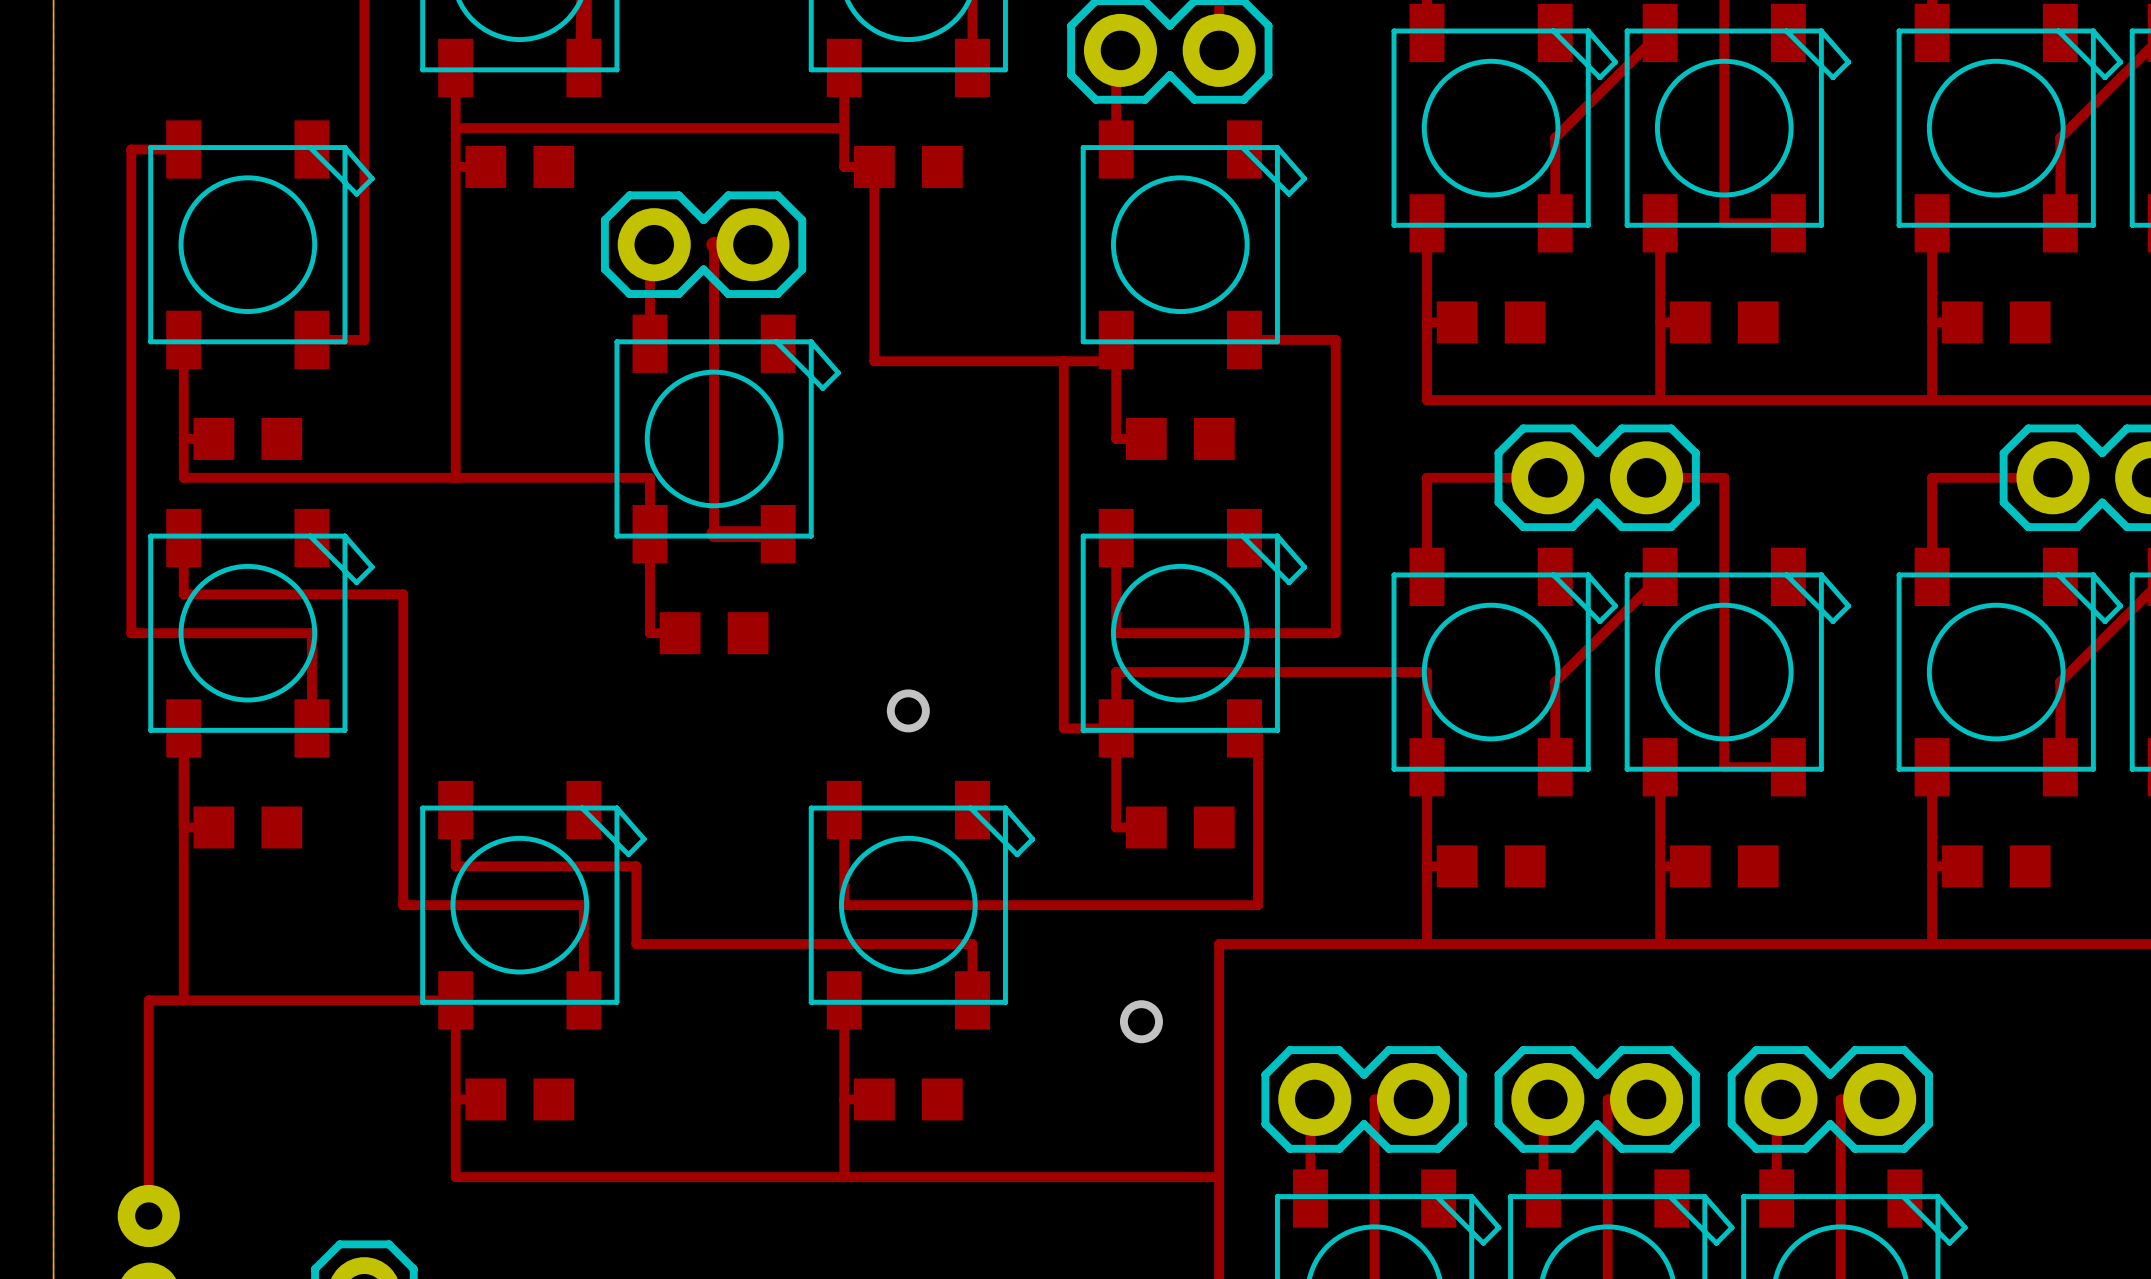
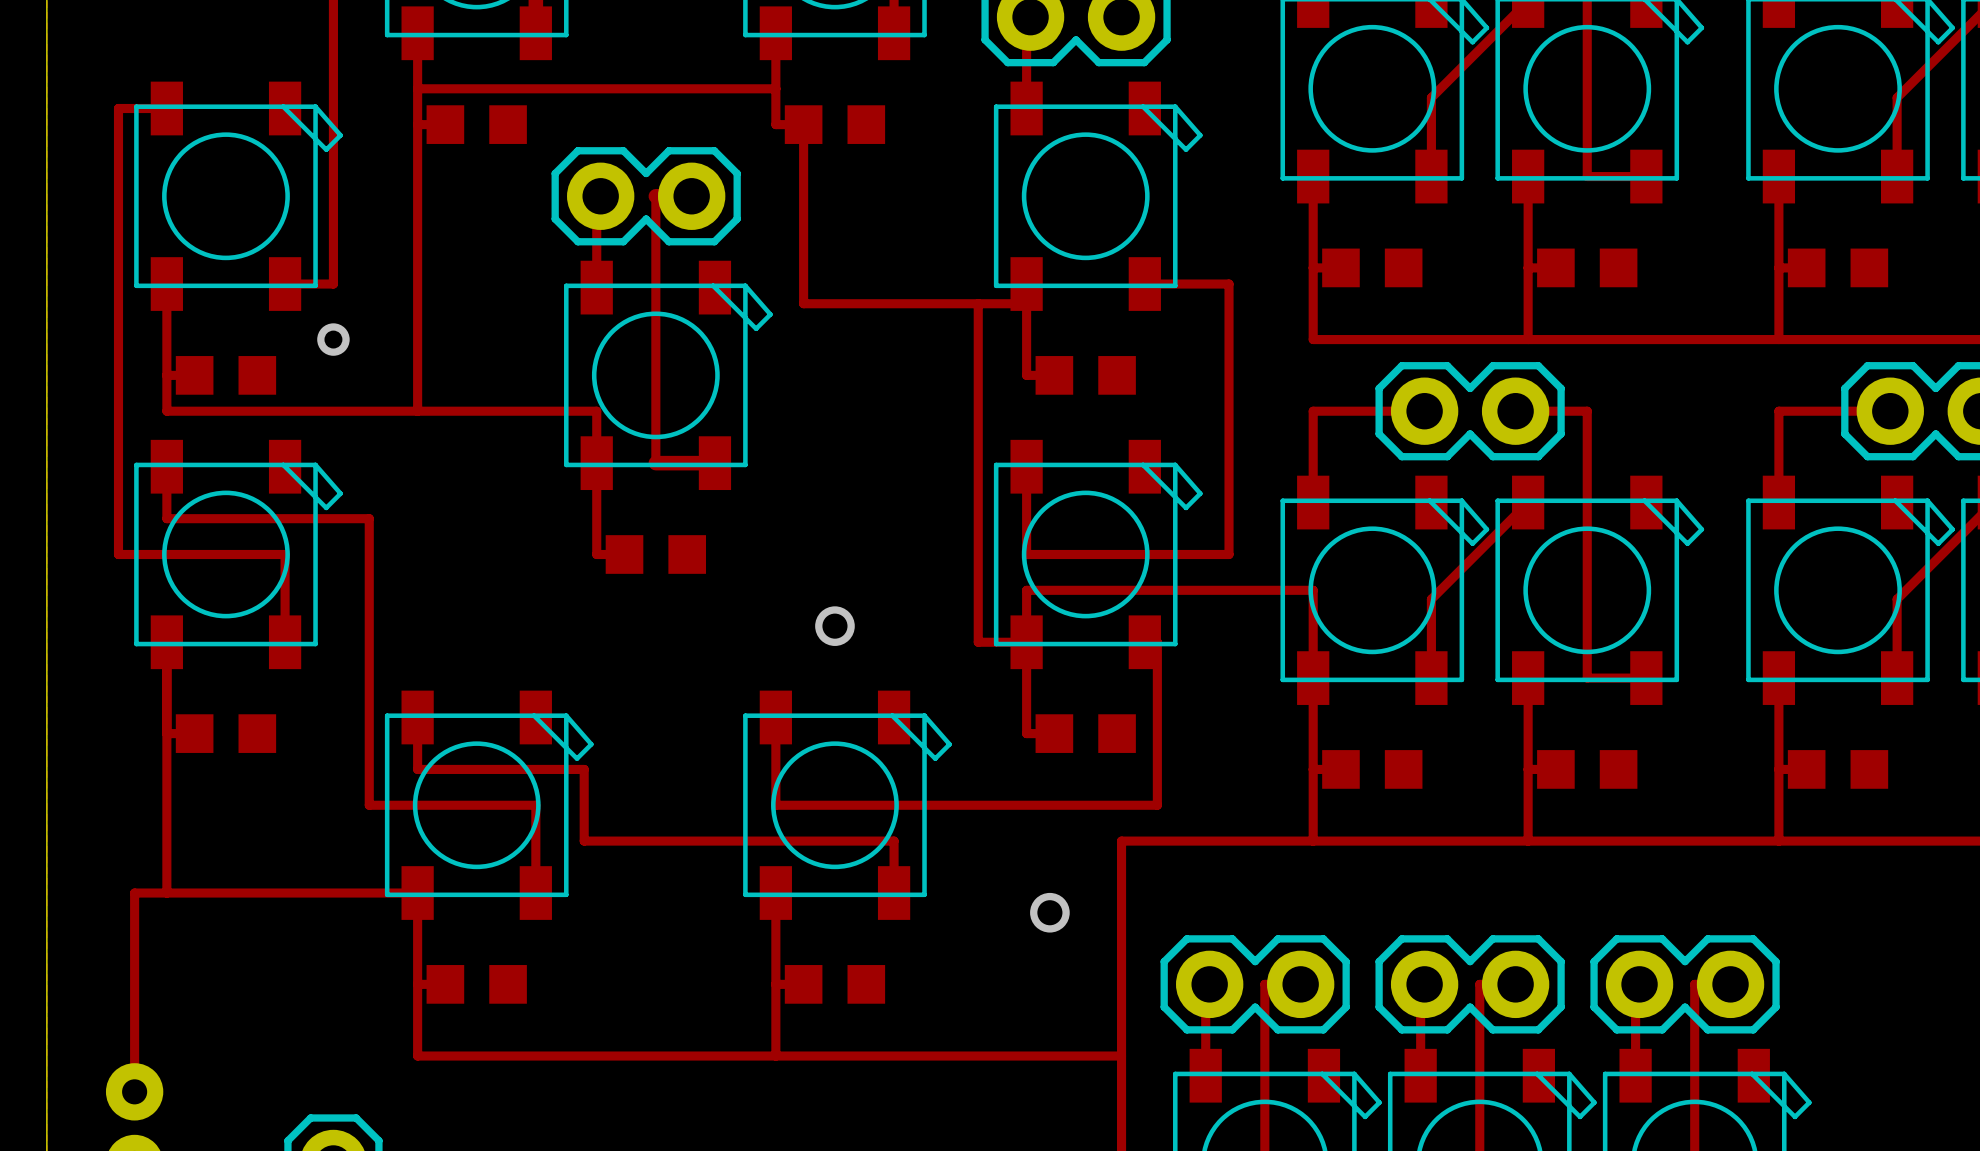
via: none -> (333, 339)

